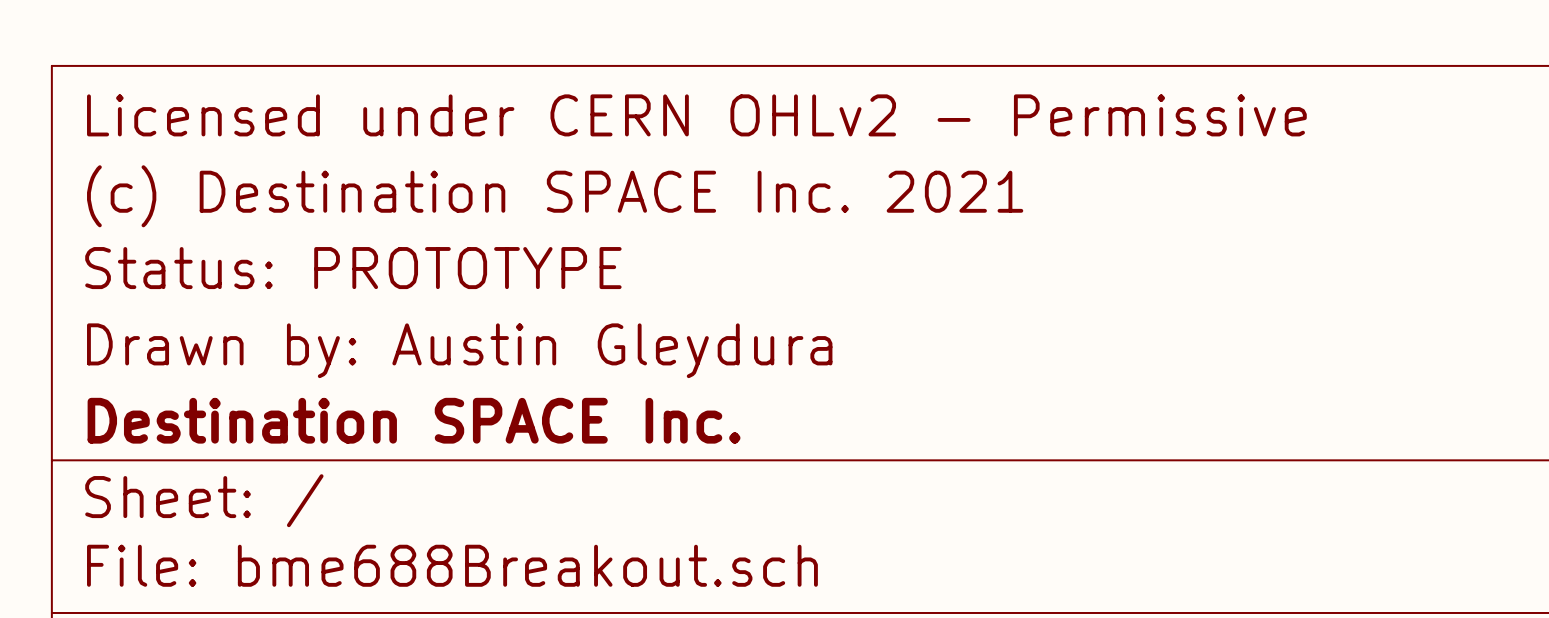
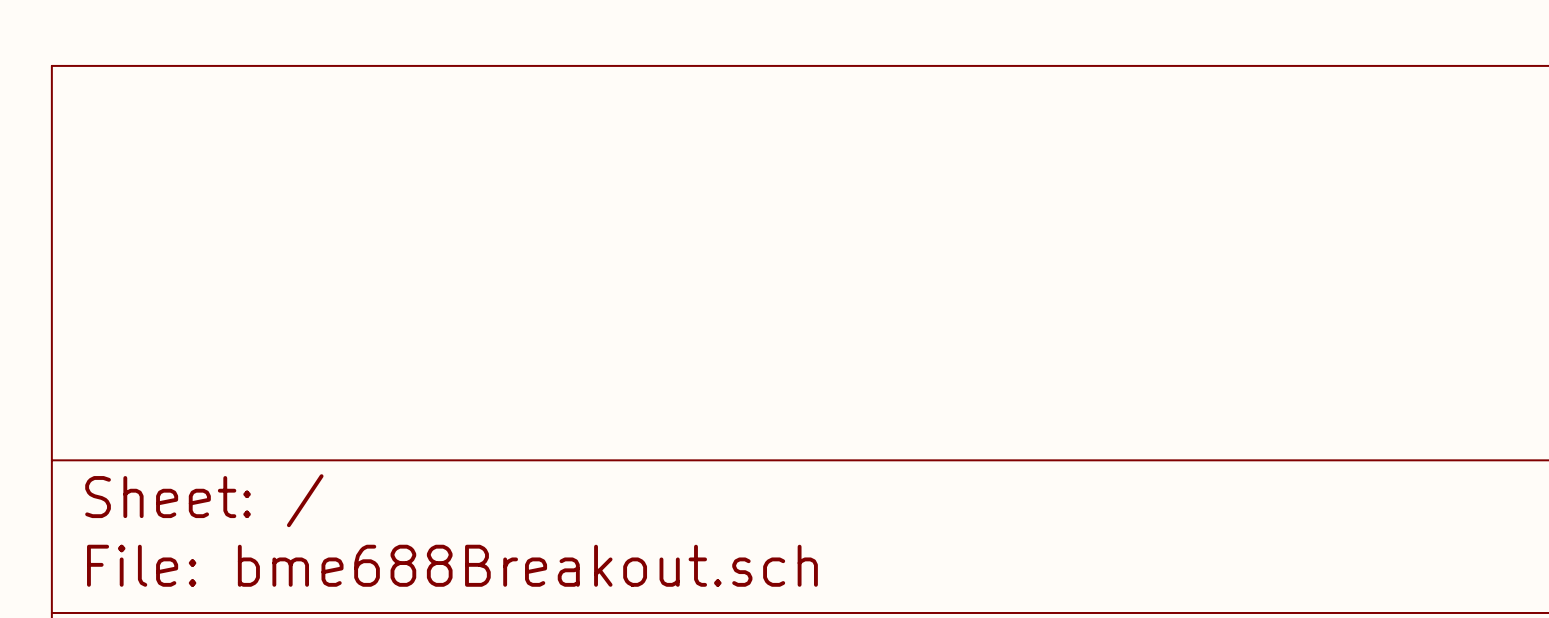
title block: Licensed under CERN OHLv2 - Permissive (696, 115) -> none
title block: (c) Destination SPACE Inc. 2021 (555, 196) -> none
title block: Status: PROTOTYPE (353, 268) -> none
title block: Drawn by: Austin Gleydura (459, 350) -> none
title block: Destination SPACE Inc. (414, 420) -> none

